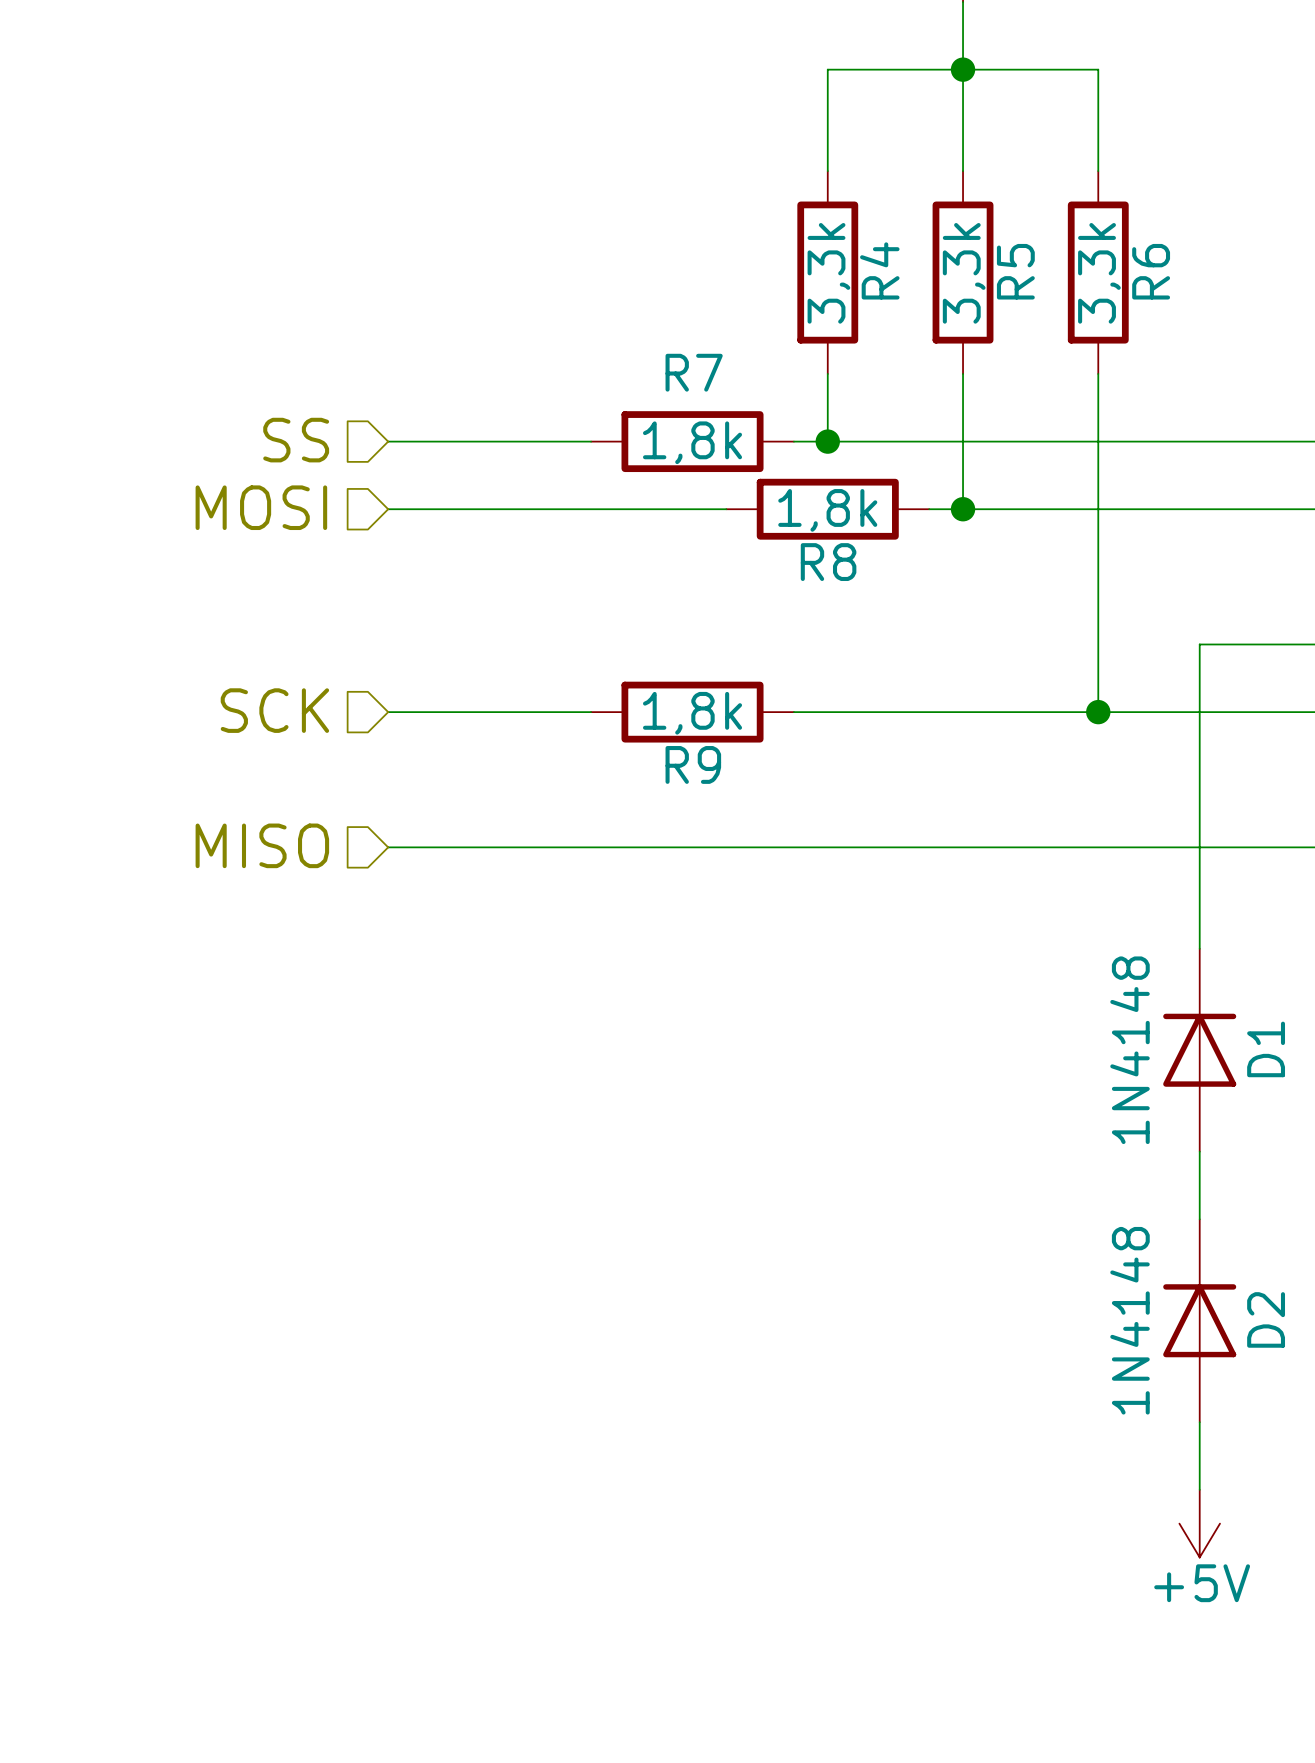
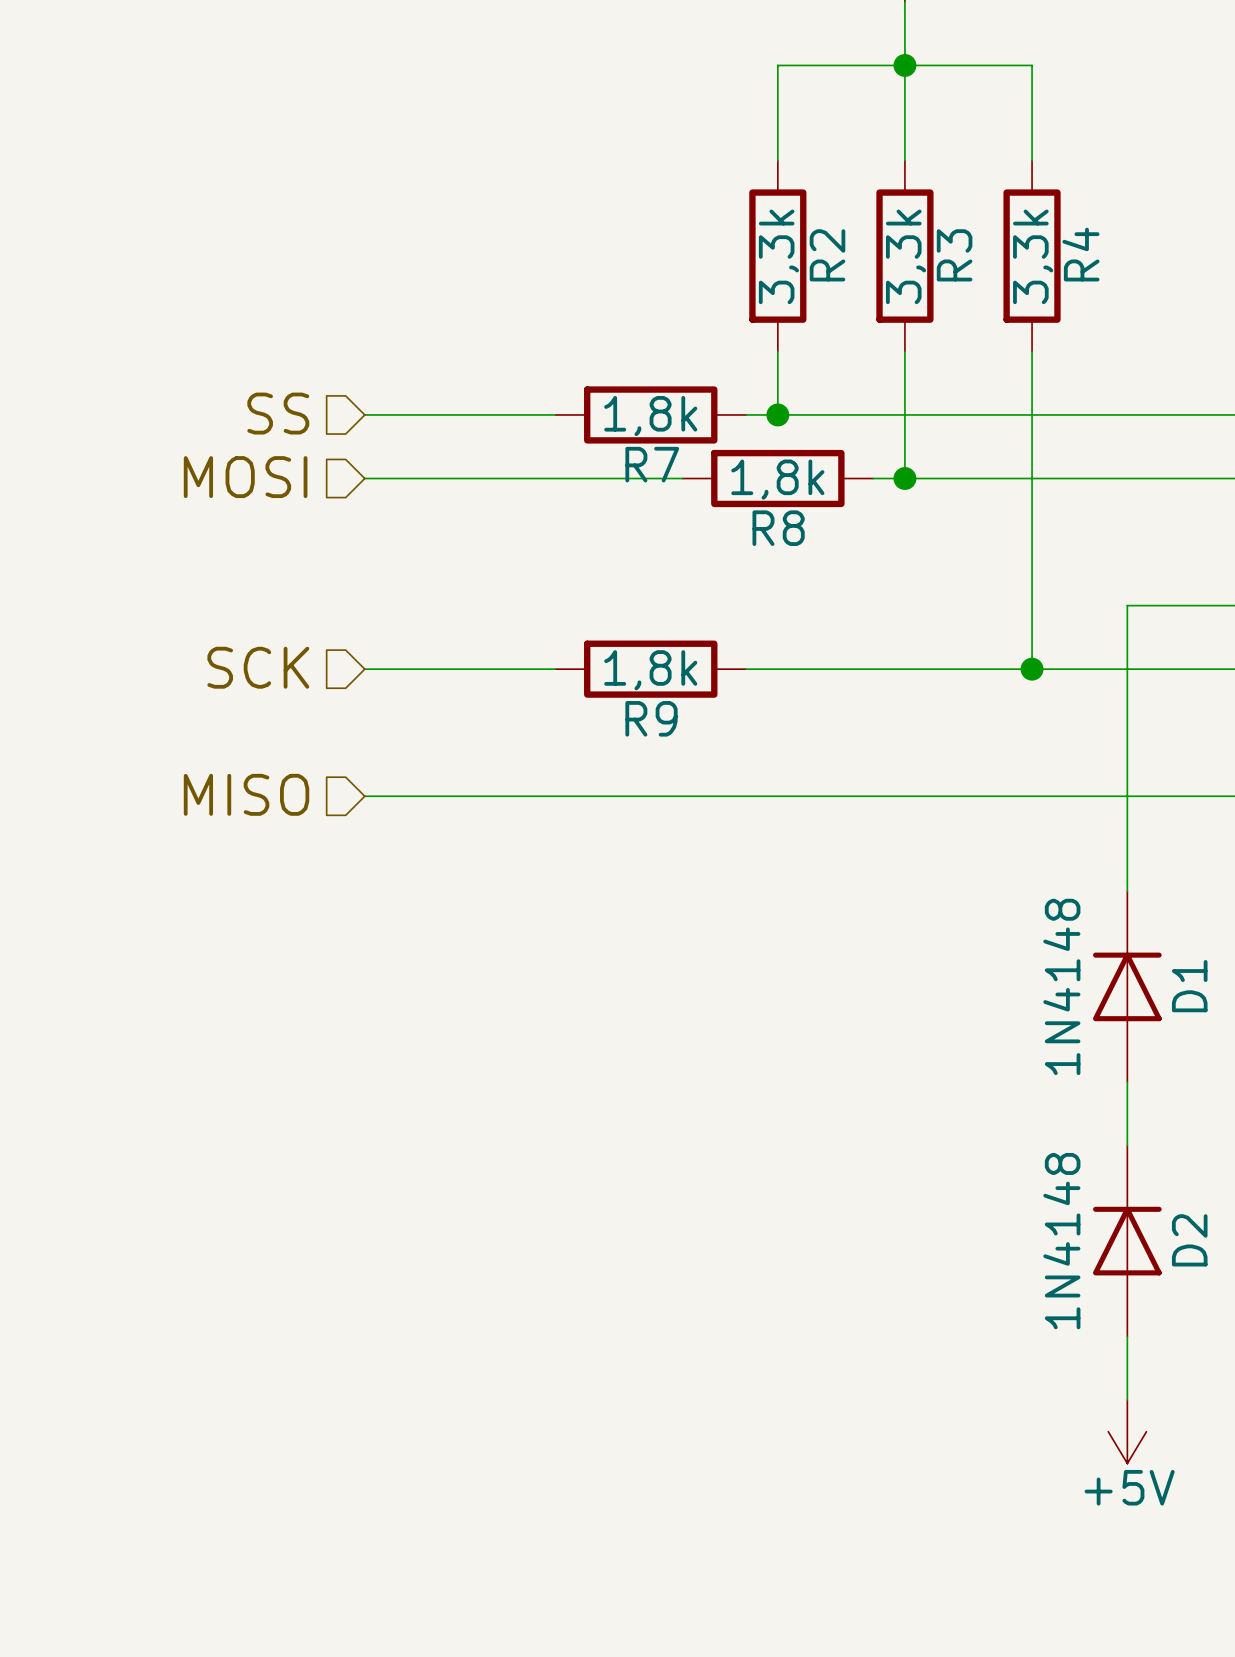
R4 name: R4 (879, 270) -> R2 (827, 255)
R5 name: R5 (1015, 271) -> R3 (954, 255)
R6 name: R6 (1151, 271) -> R4 (1080, 254)
R7 name position: R7 (694, 372) -> R7 (652, 464)

